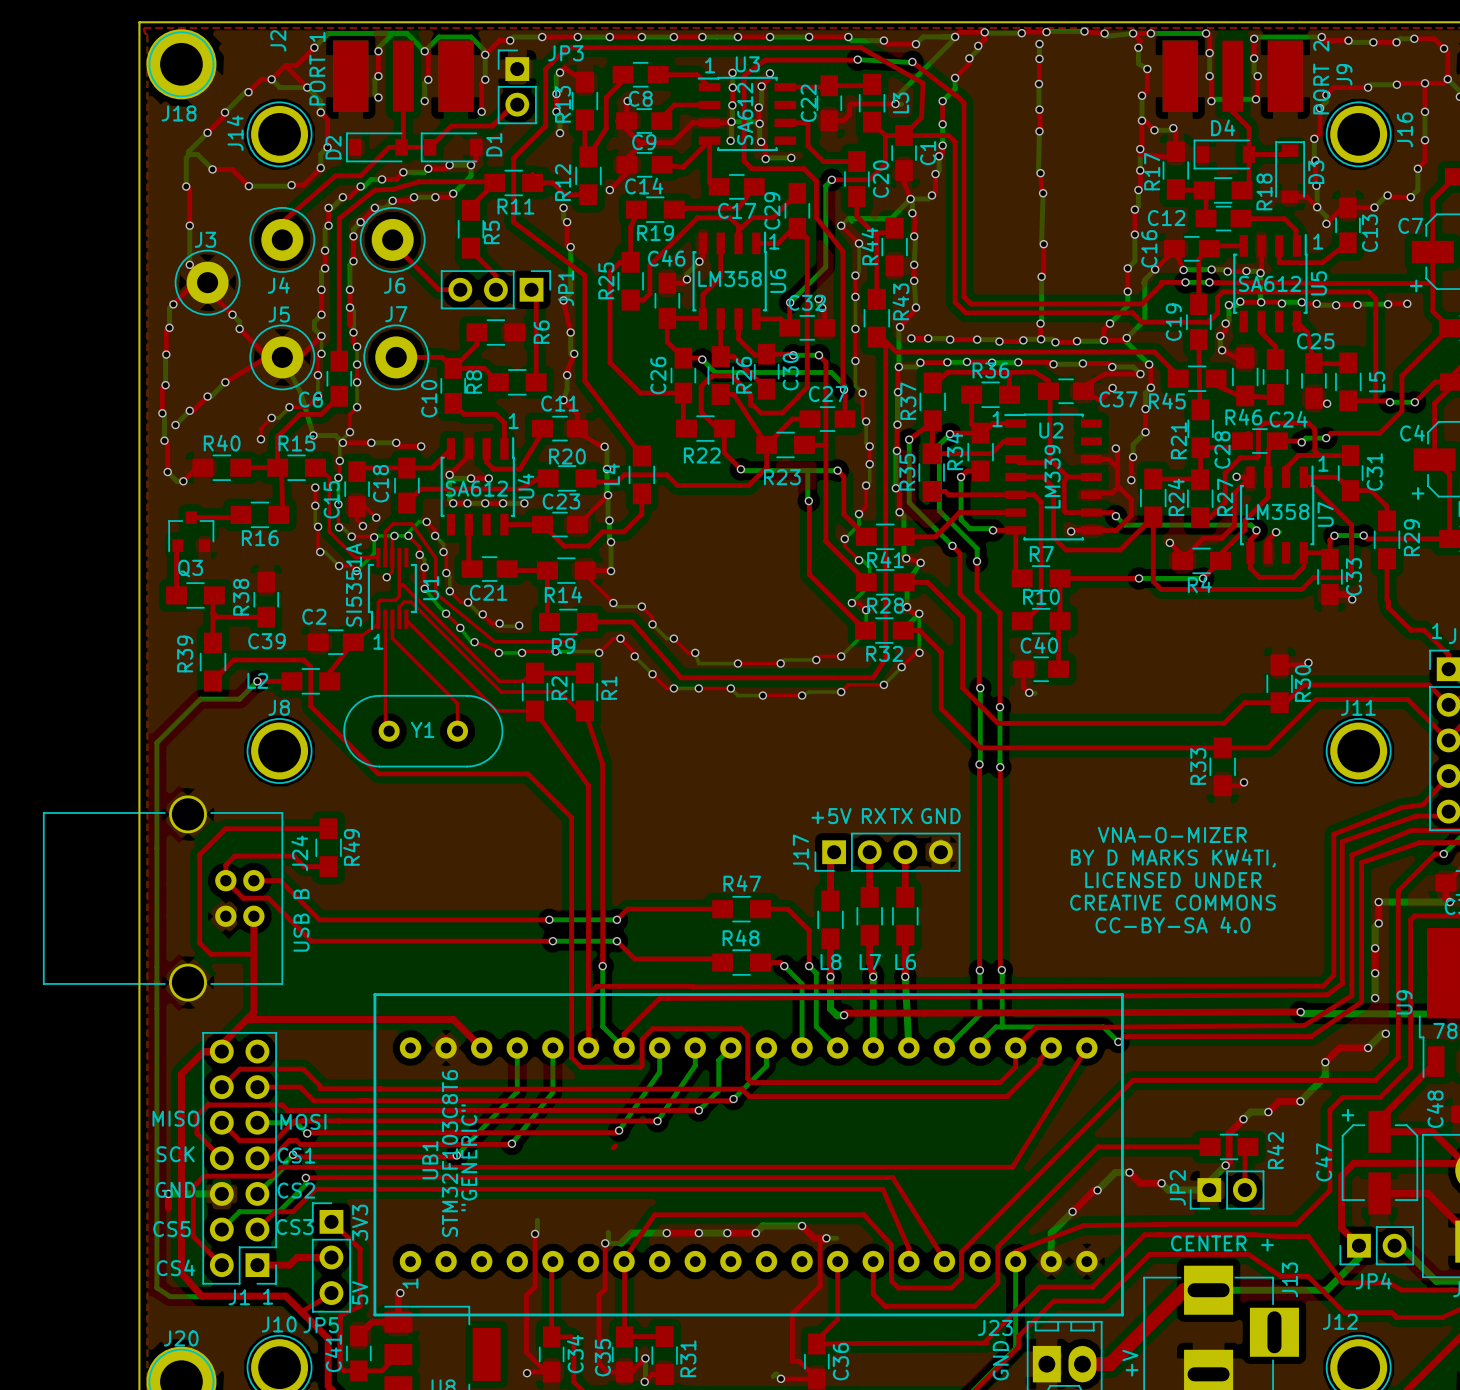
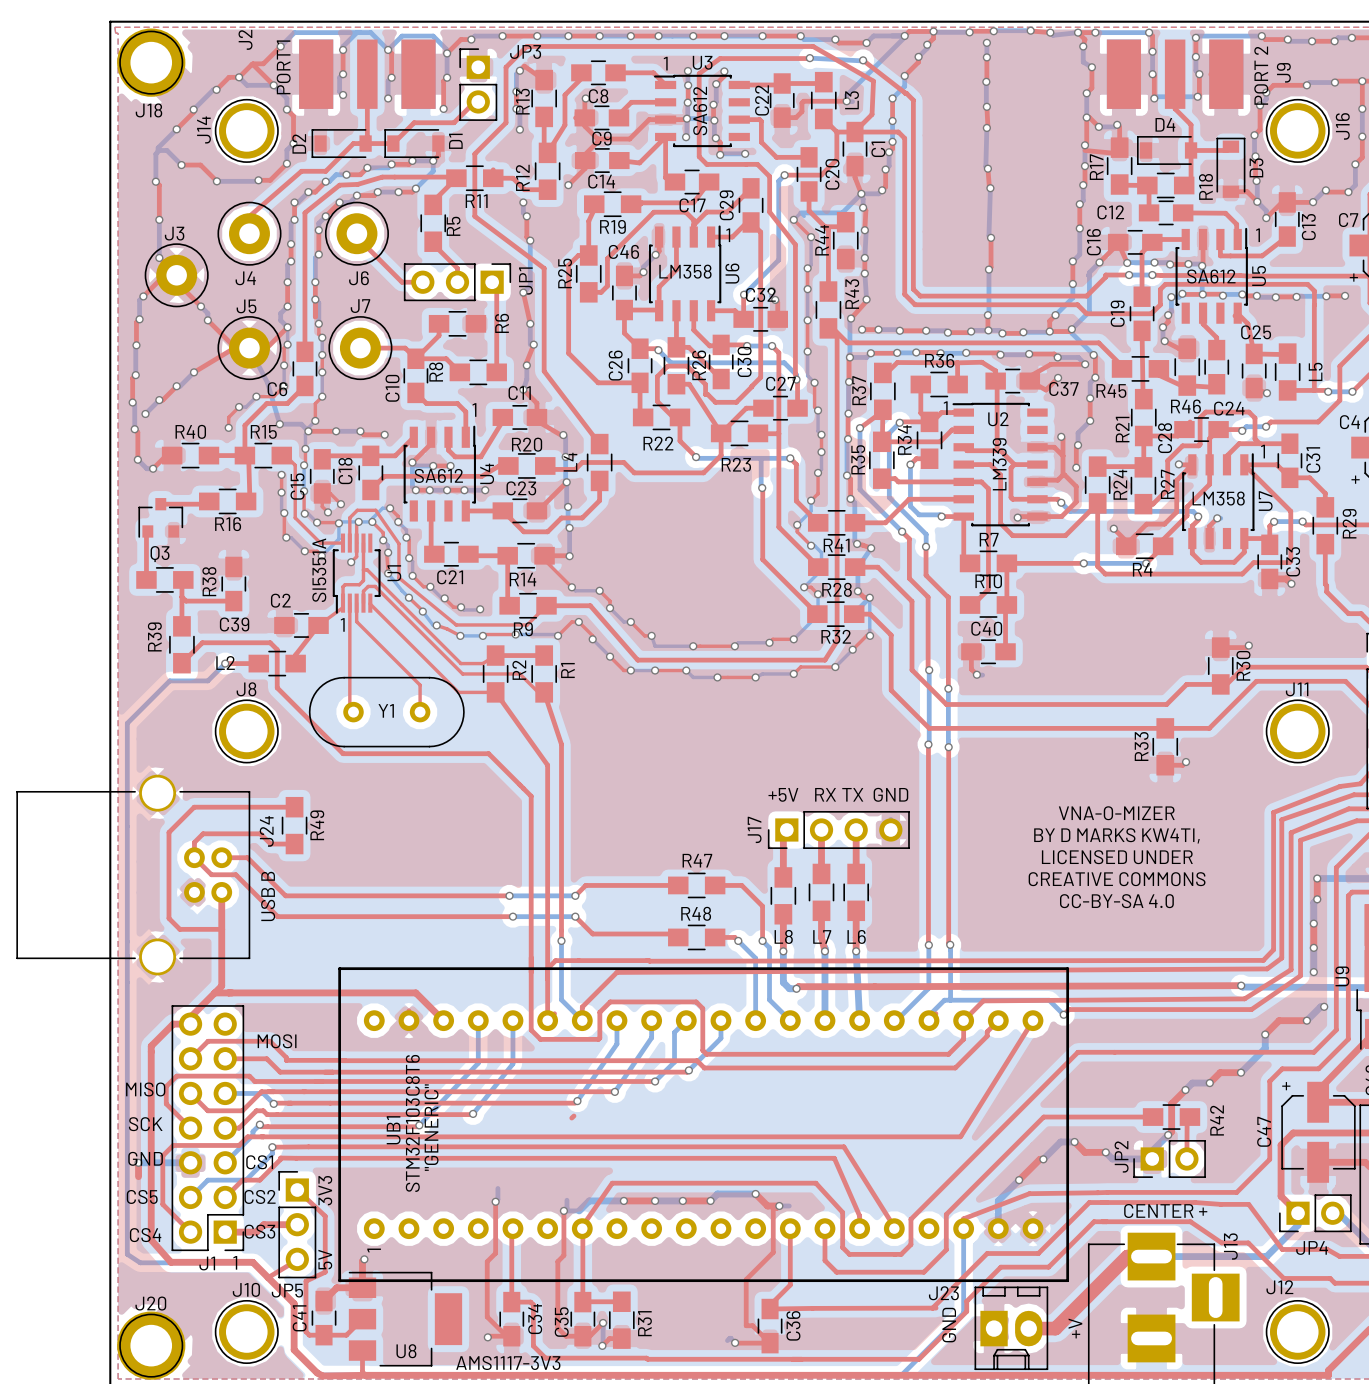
text position: MOSI (303, 1121) -> MOSI (277, 1041)
text position: CS1 (296, 1155) -> CS1 (259, 1162)
text position: CS2 (296, 1190) -> CS2 (260, 1196)
text position: CS3 (294, 1226) -> CS3 (259, 1231)

